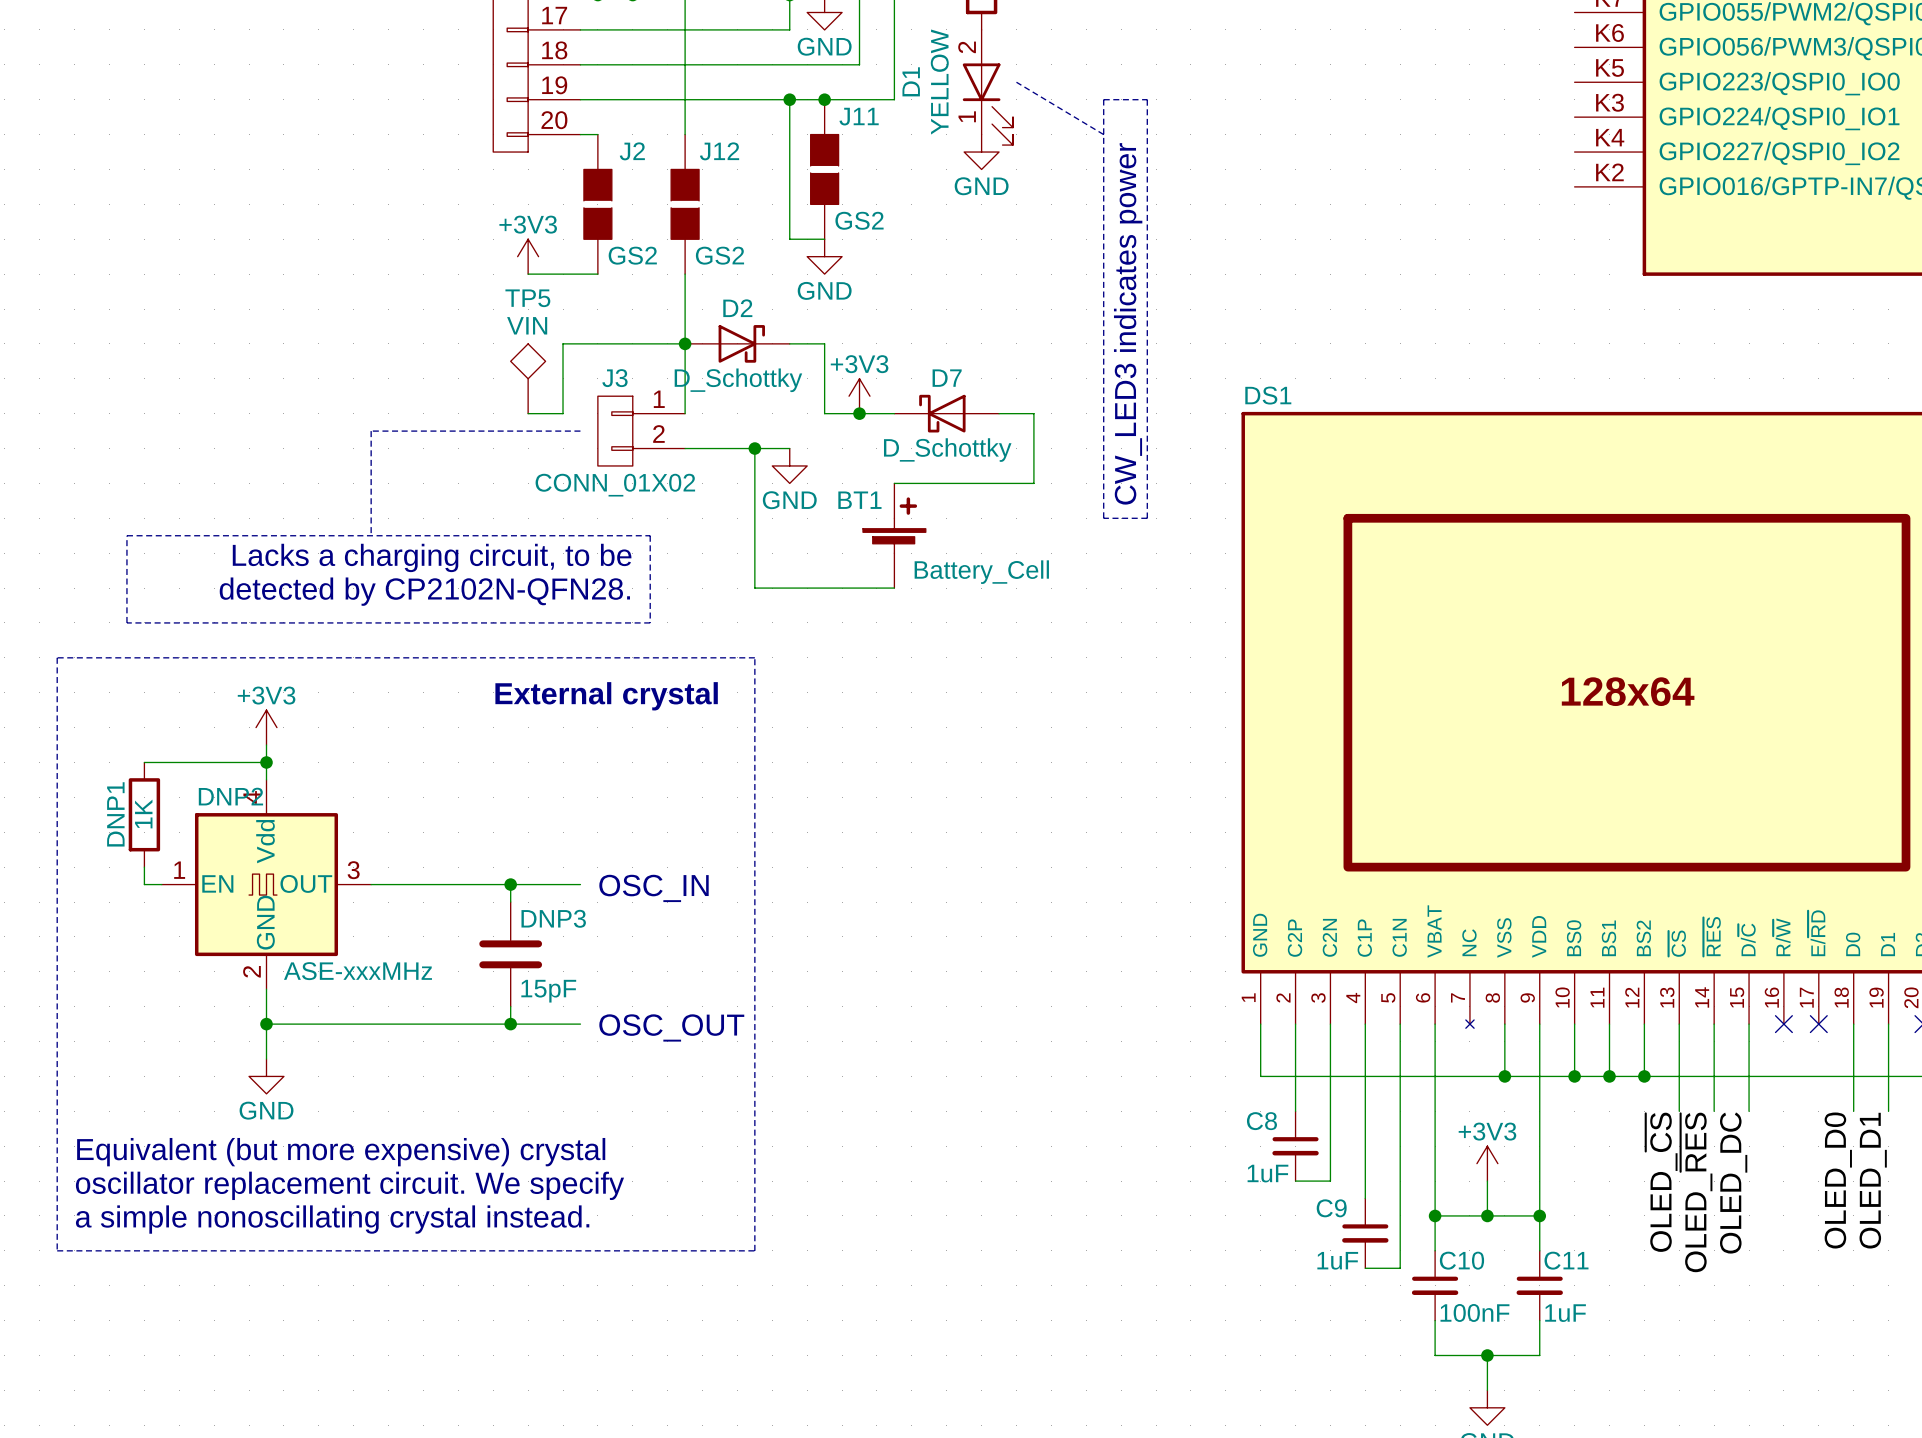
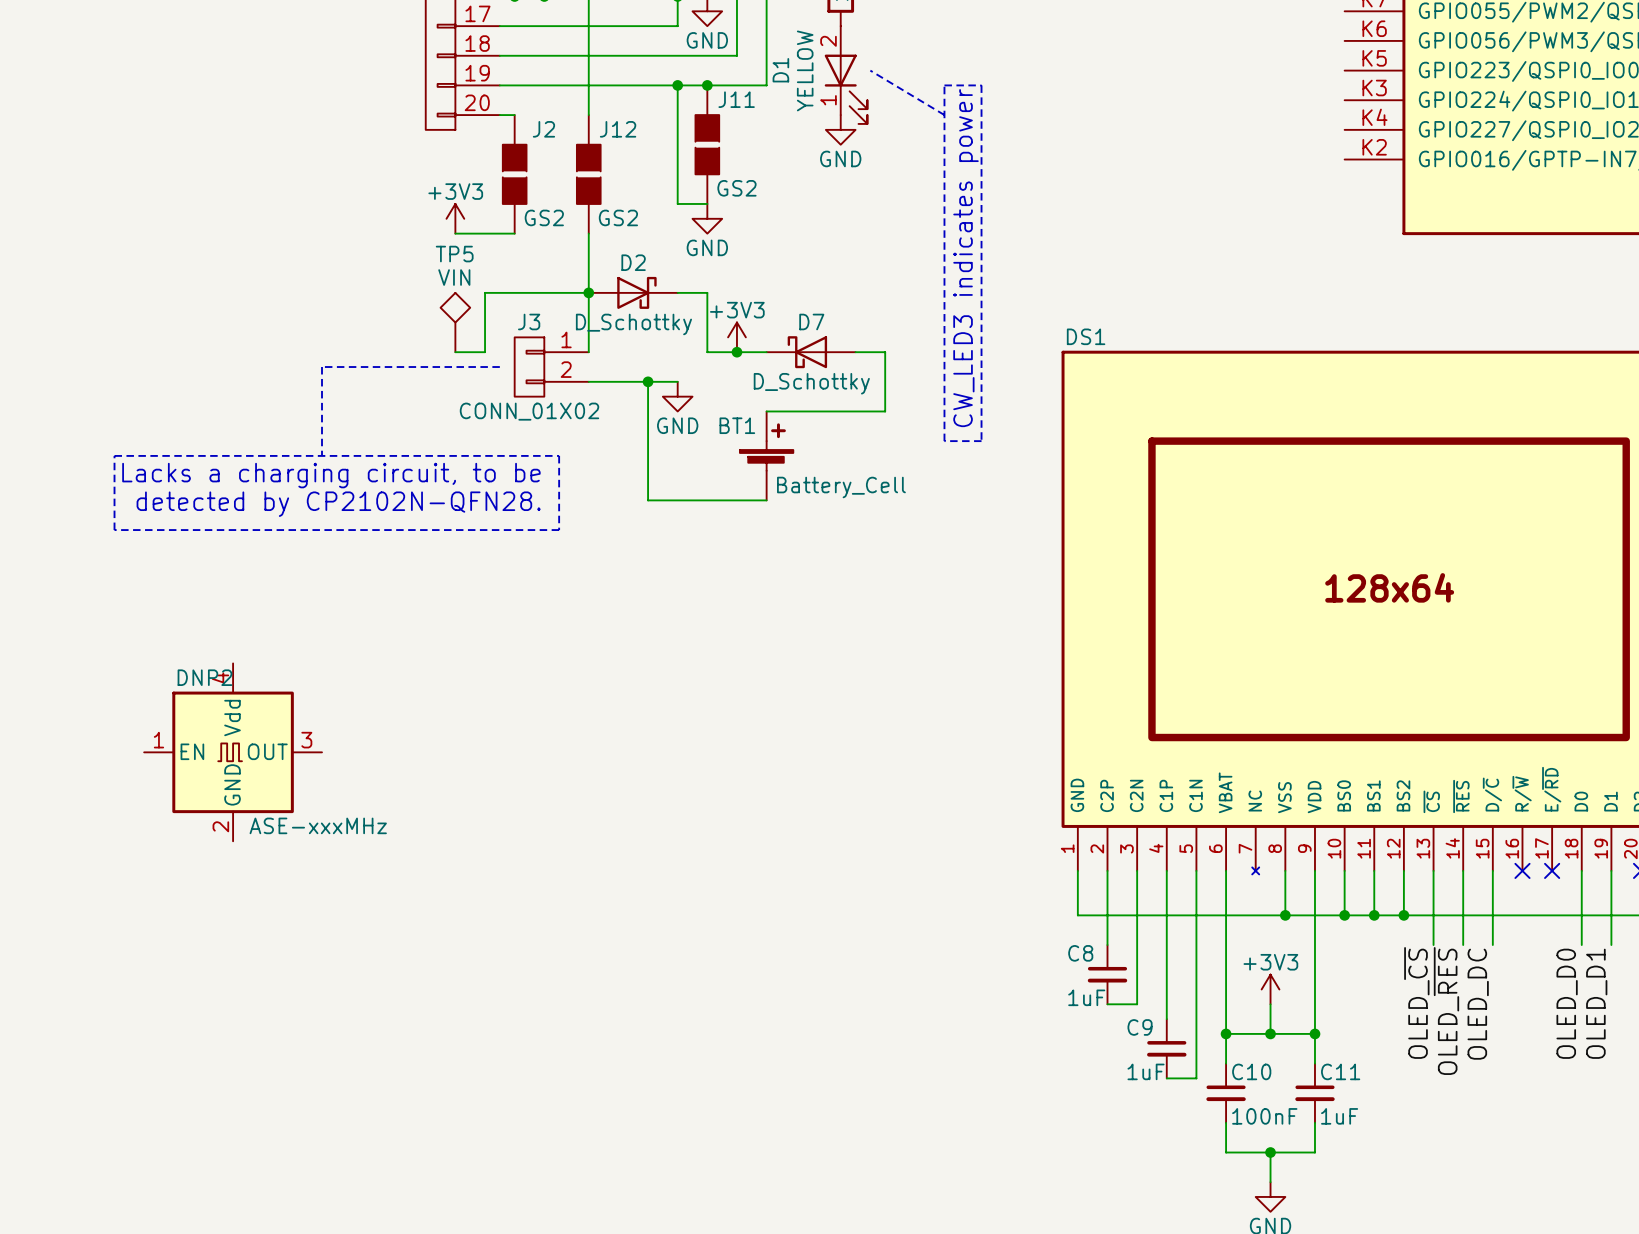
line: (57, 657) (57, 1250) (754, 1250) (754, 657) (57, 657) -> none
text: External crystal (606, 696) -> none
power symbol: +3V3 (266, 727) -> none
wire: (266, 745) (266, 779) -> none
wire: (144, 762) (266, 762) -> none
junction: (266, 762) -> none
DNP1: 1K (144, 814) -> none
wire: (144, 867) (144, 884) (161, 884) -> none
wire: (371, 884) (580, 884) -> none
wire: (510, 884) (510, 902) -> none
junction: (510, 884) -> none
text: OSC_IN (654, 888) -> none
DNP3: 15pF (510, 954) -> none
wire: (266, 989) (266, 1058) -> none
wire: (510, 1006) (510, 1024) -> none
wire: (266, 1024) (580, 1024) -> none
junction: (266, 1024) -> none
junction: (510, 1024) -> none
text: OSC_OUT (671, 1027) -> none
power symbol: GND (266, 1076) -> none
text: Equivalent (but more expensive) crystal (341, 1152) -> none
text: oscillator replacement circuit. We specify (349, 1185) -> none
text: a simple nonoscillating crystal instead. (332, 1219) -> none

